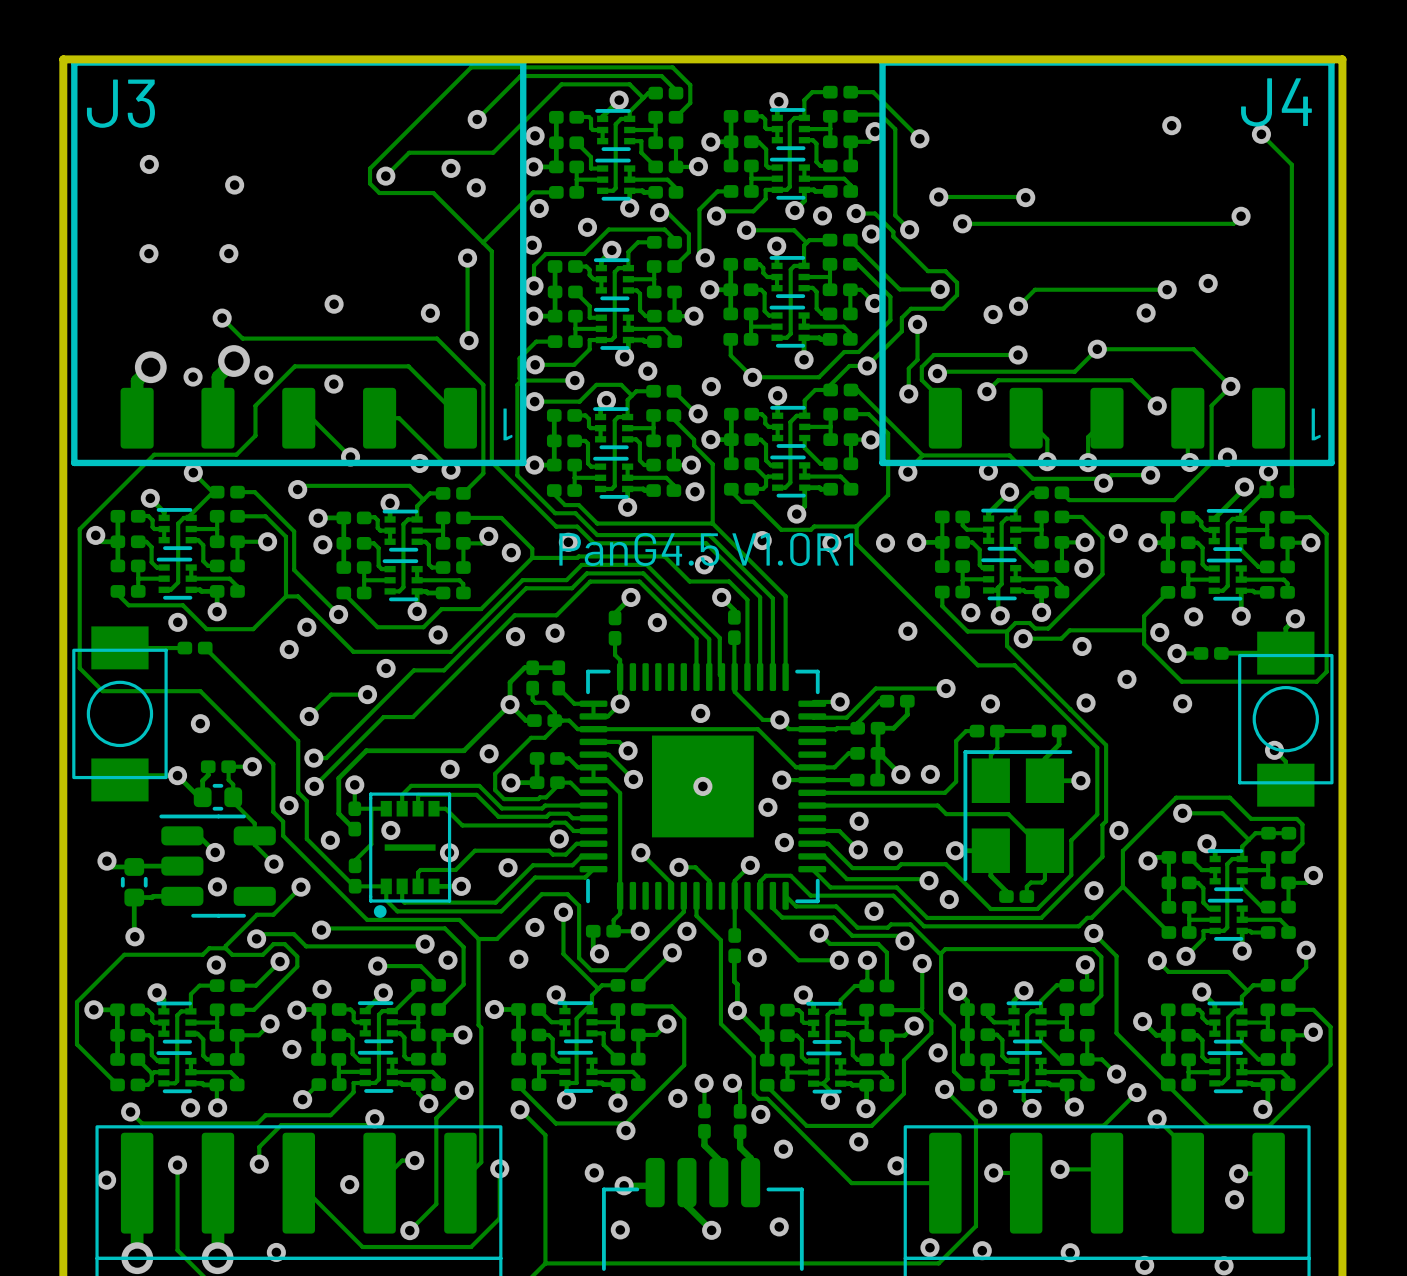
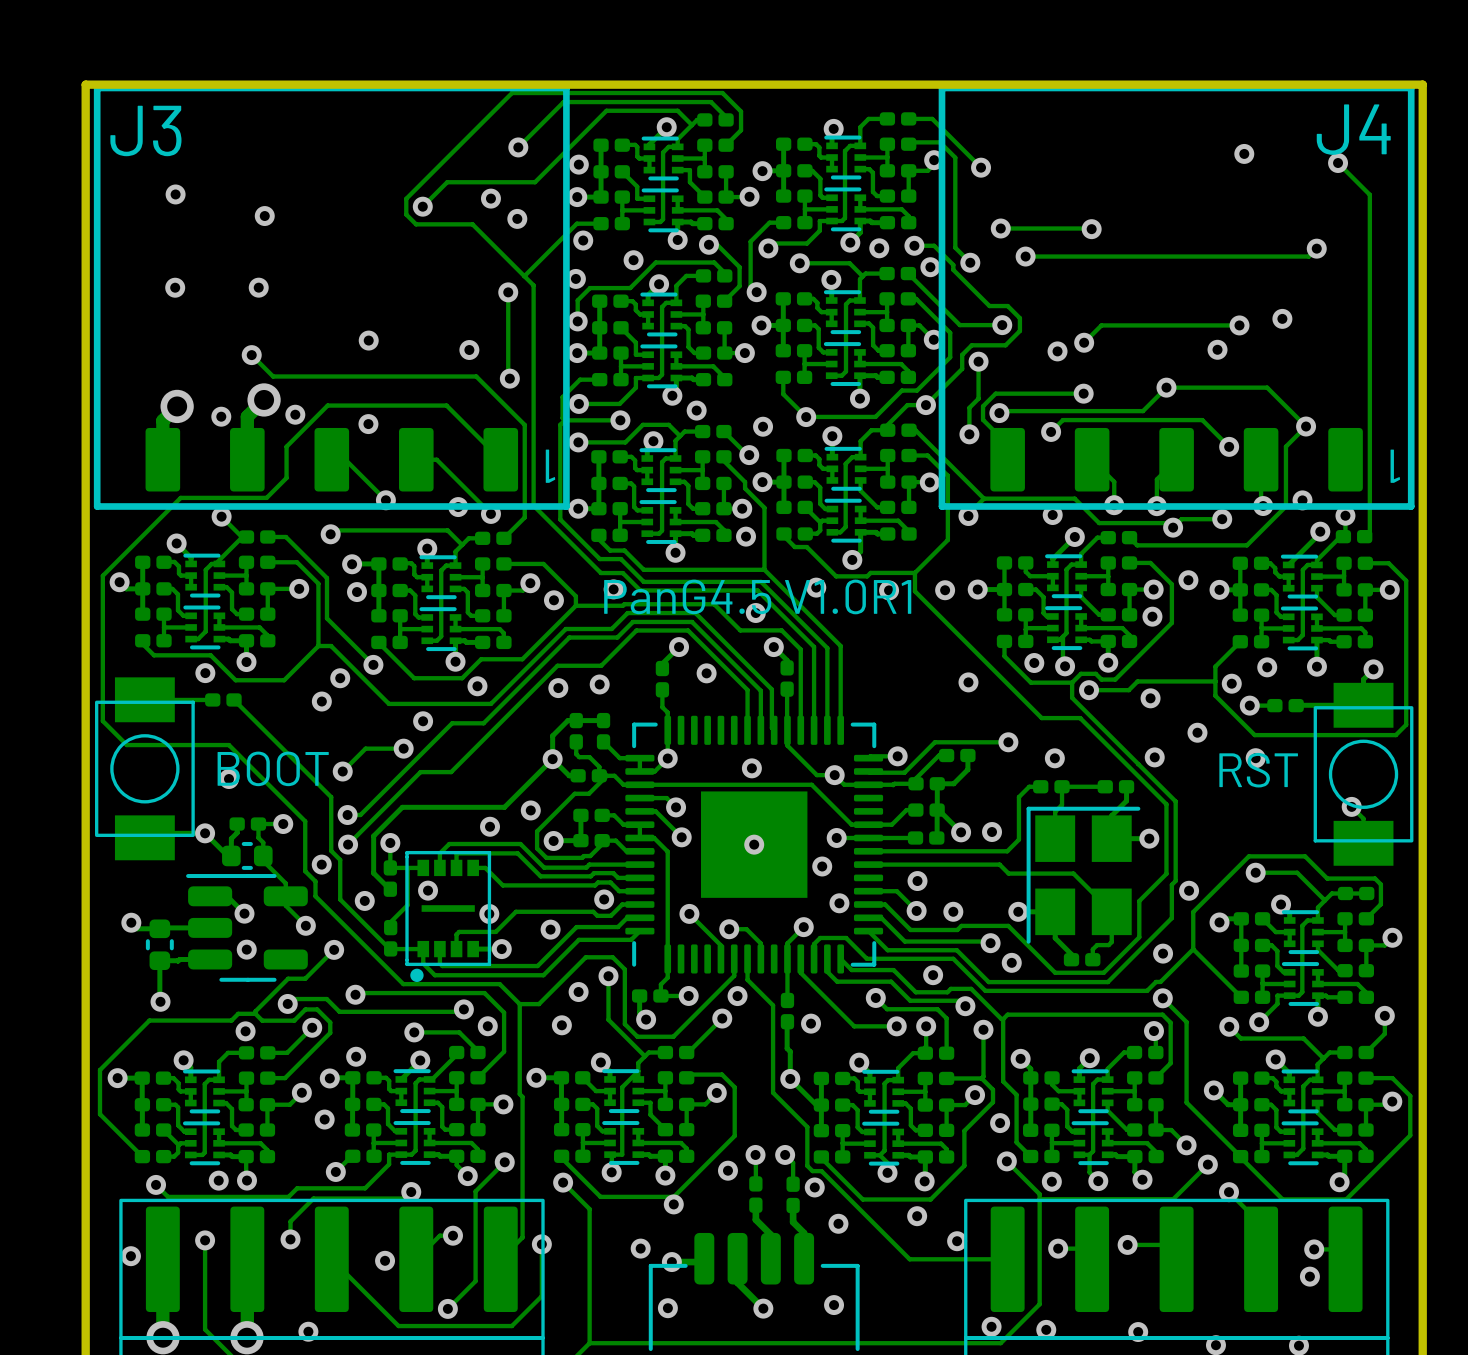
text: none -> BOOT (273, 768)
text: none -> RST (1258, 770)

